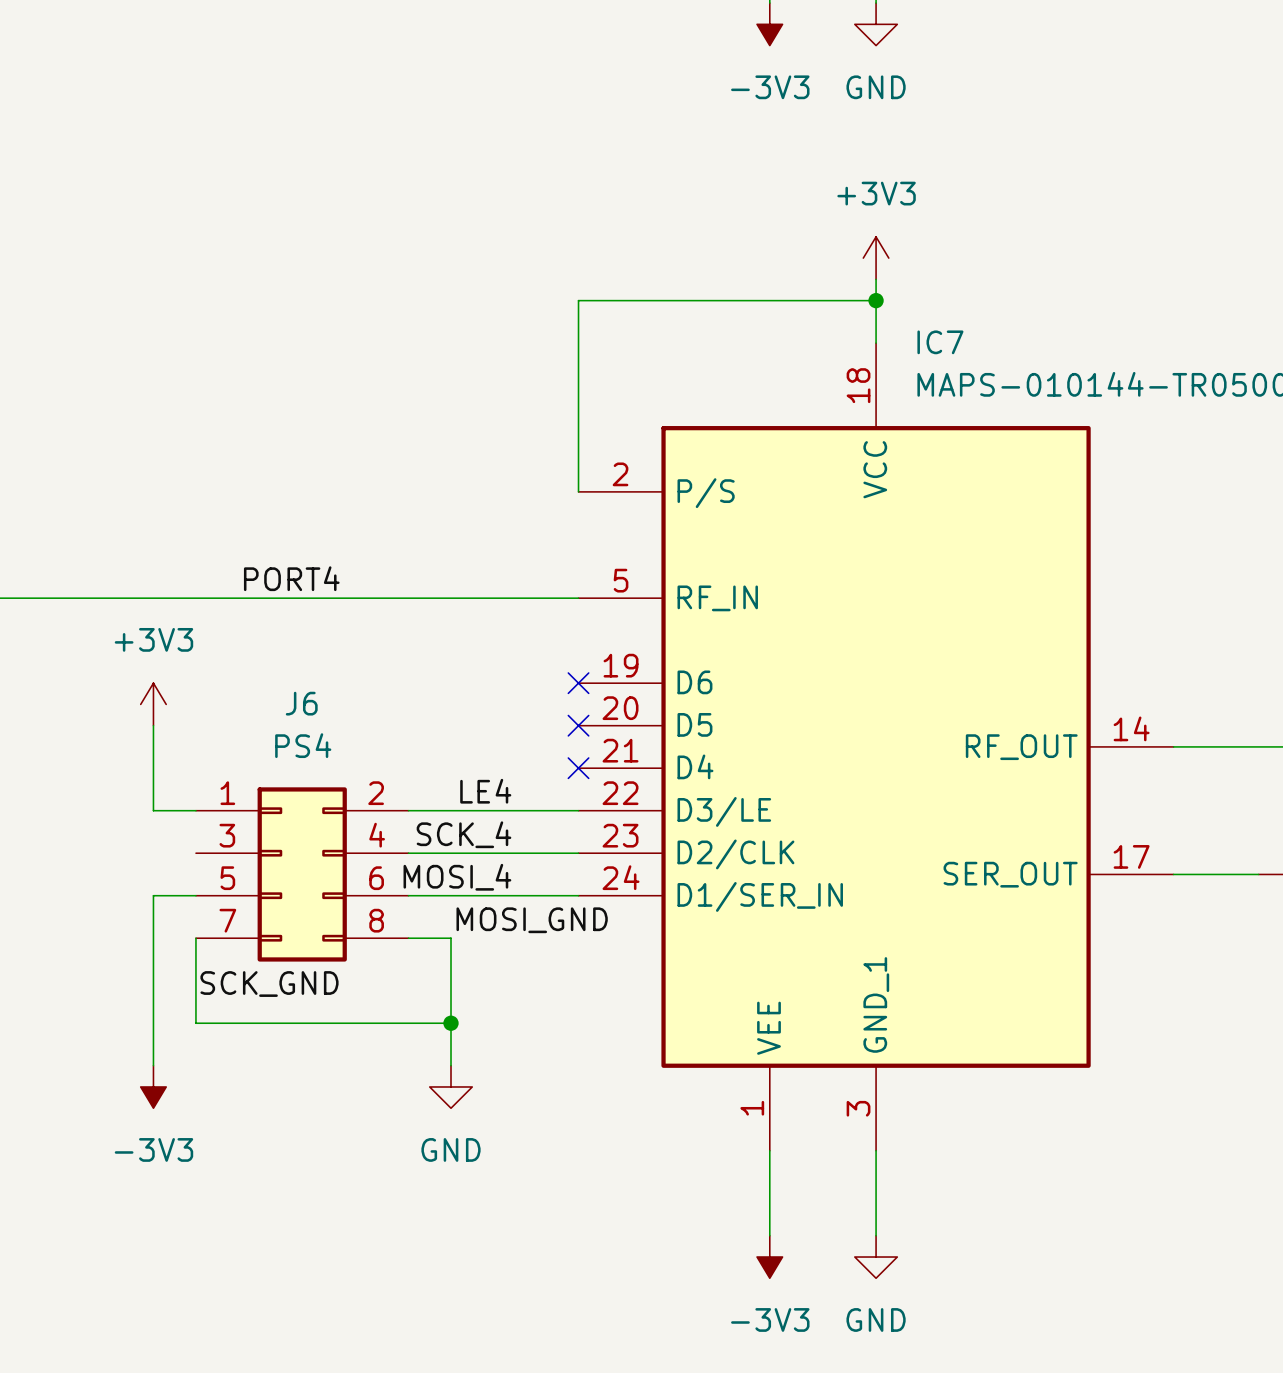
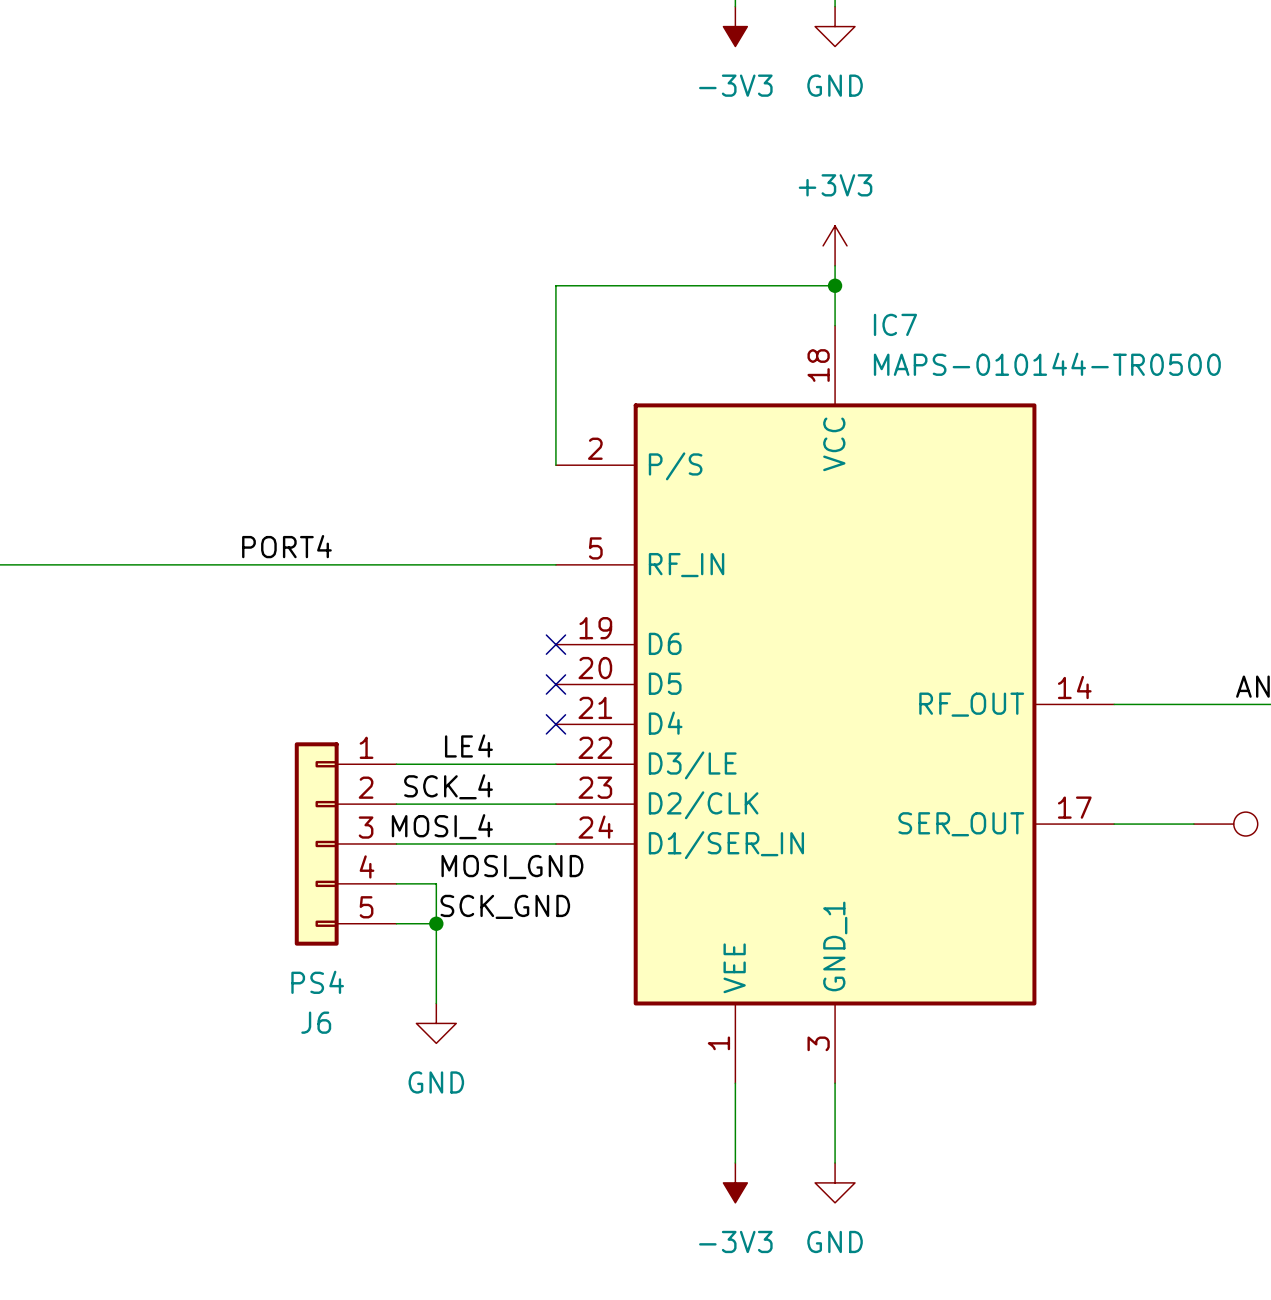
J6 name position: J6 (301, 703) -> J6 (316, 1022)
power symbol: +3V3 (153, 704) -> none
wire: (153, 725) (153, 810) (195, 810) -> none
J6 value position: PS4 (303, 745) -> PS4 (317, 982)
J6 symbol: [195, 787, 409, 962] -> [294, 742, 397, 946]
wire: (195, 895) (153, 895) (153, 1065) -> none
wire: (195, 938) (195, 1023) (451, 1023) -> none
wire: none -> (396, 923) (436, 923)
label position: SCK_GND (269, 984) -> SCK_GND (505, 906)
junction position: (451, 1023) -> (436, 923)
power symbol: -3V3 (153, 1086) -> none

